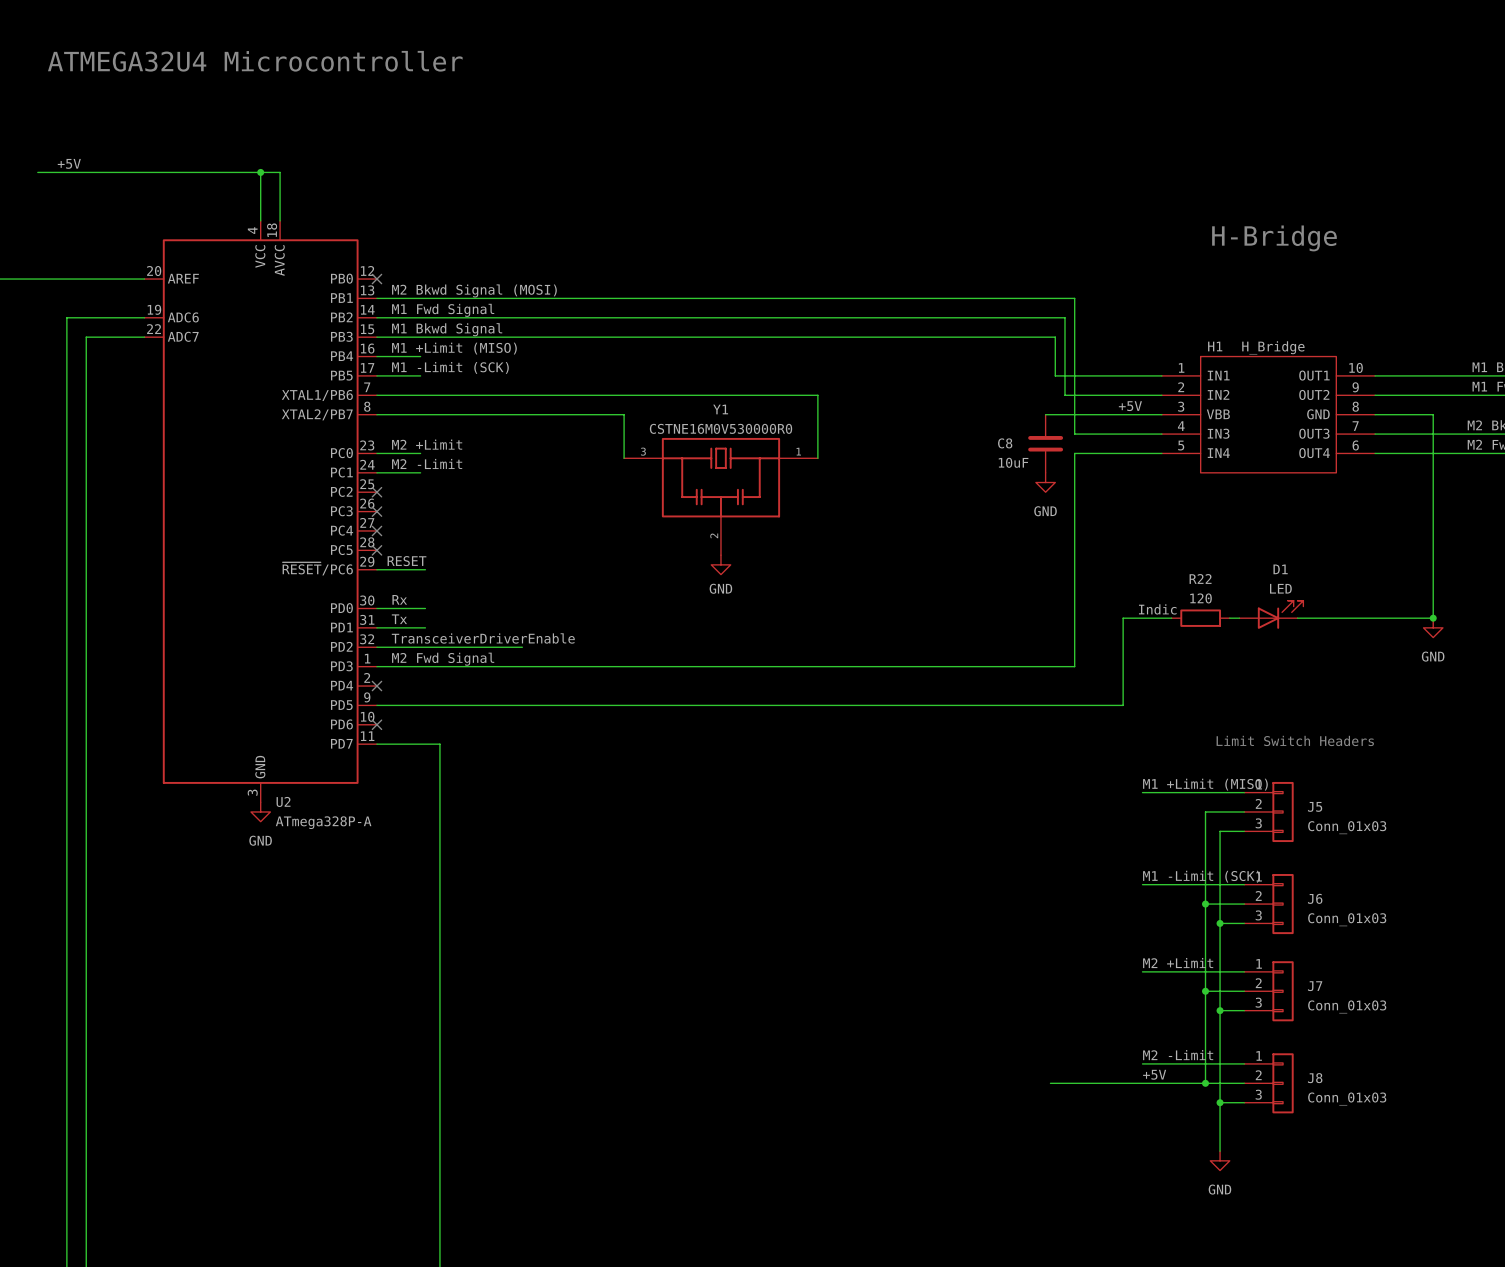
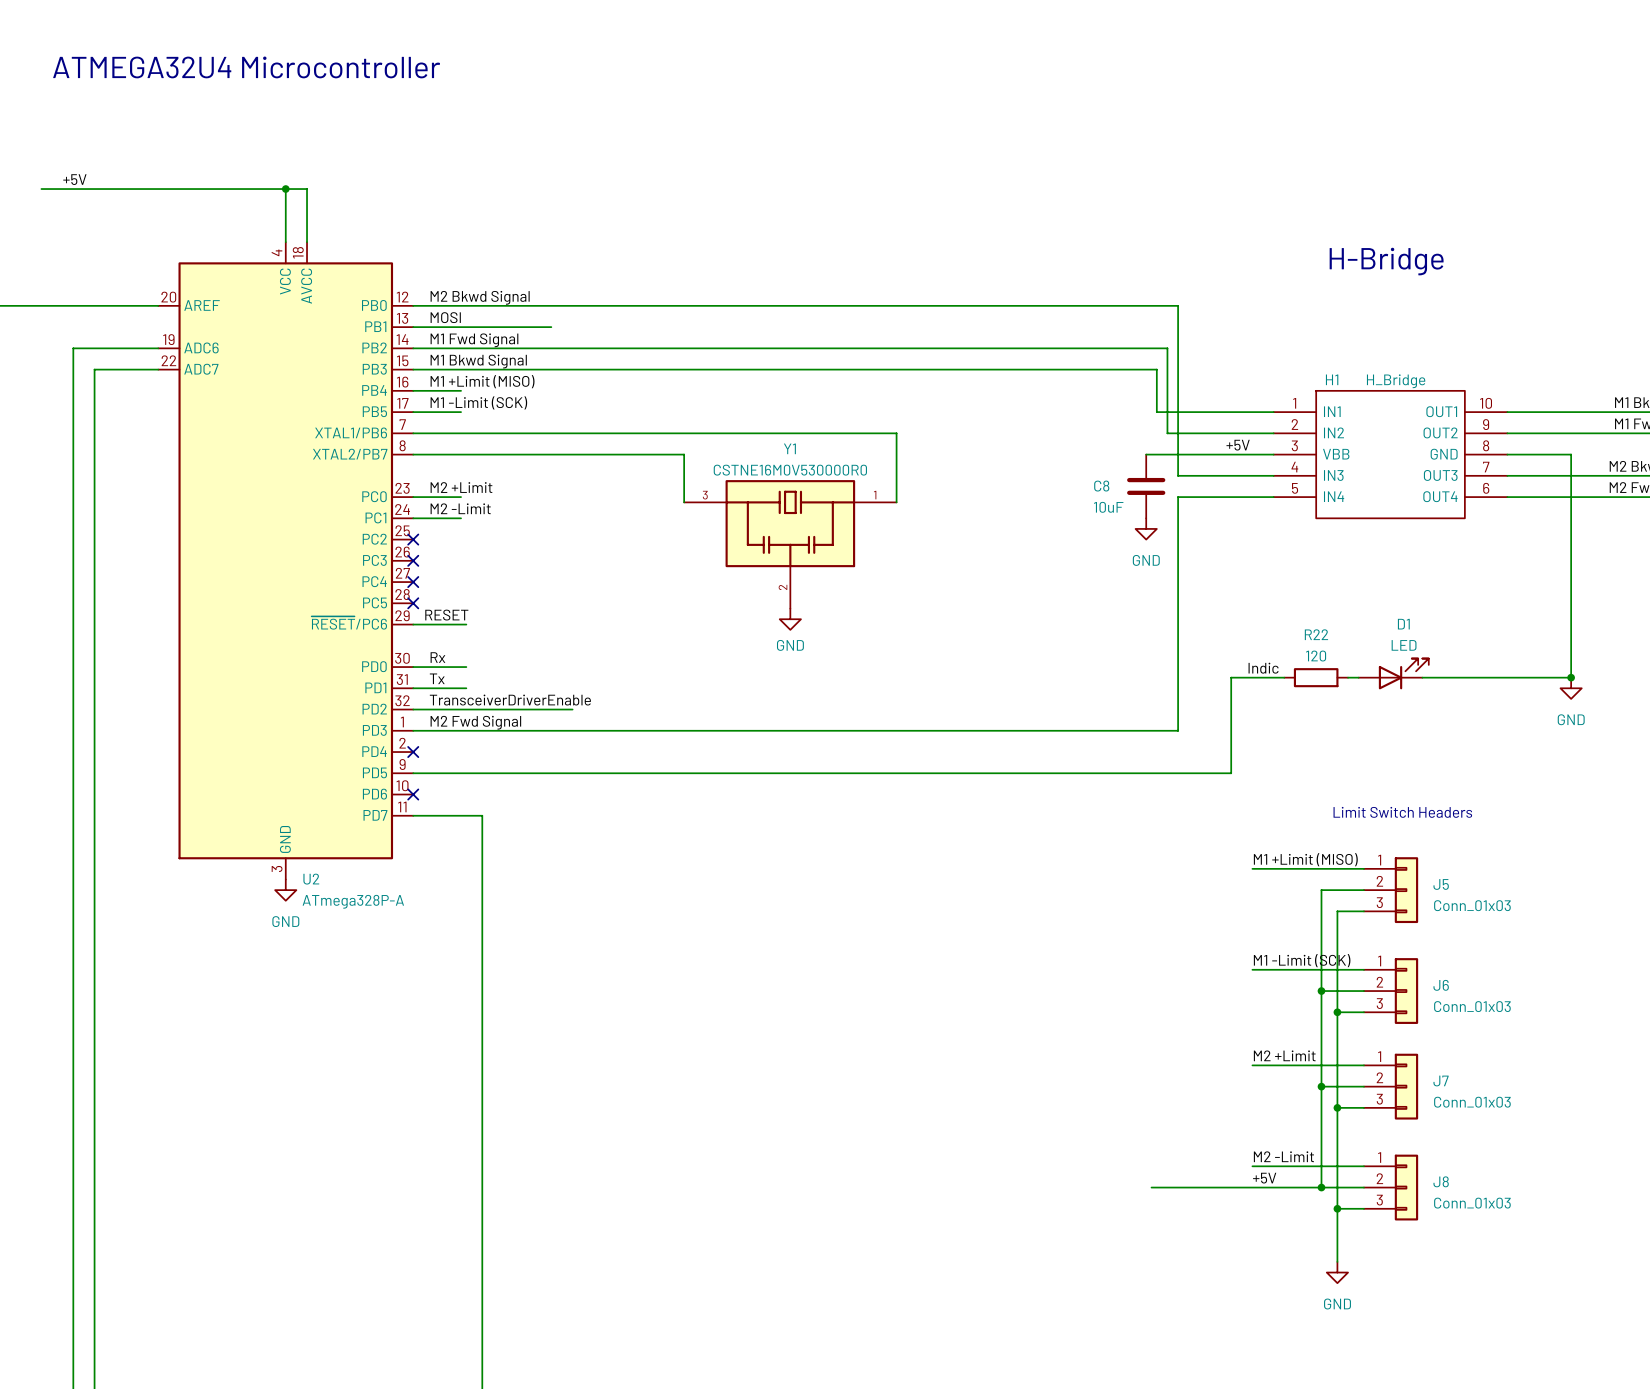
label: none -> M2 Bkwd Signal (480, 297)
no-connect mark: (376, 279) -> none
label: M2 Bkwd Signal (MOSI) (474, 290) -> MOSI (445, 317)
wire: (502, 298) (1074, 298) -> (413, 305) (1178, 305) (1178, 327)

